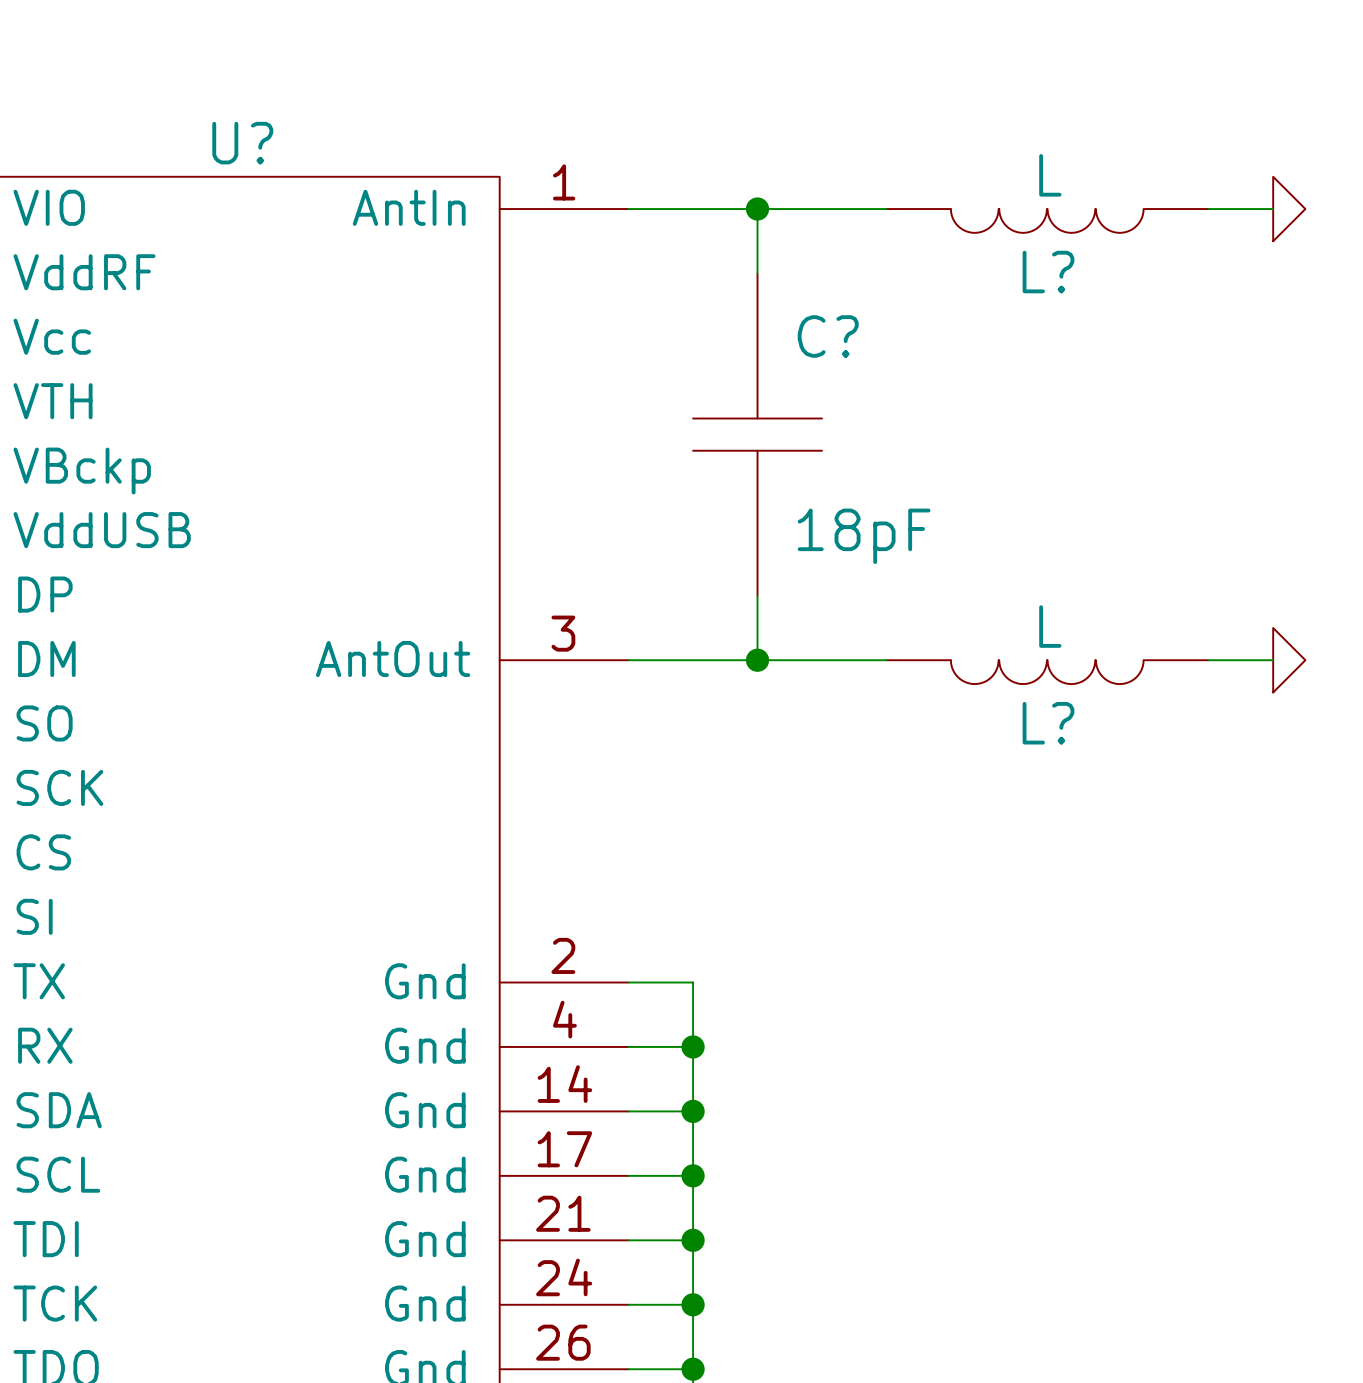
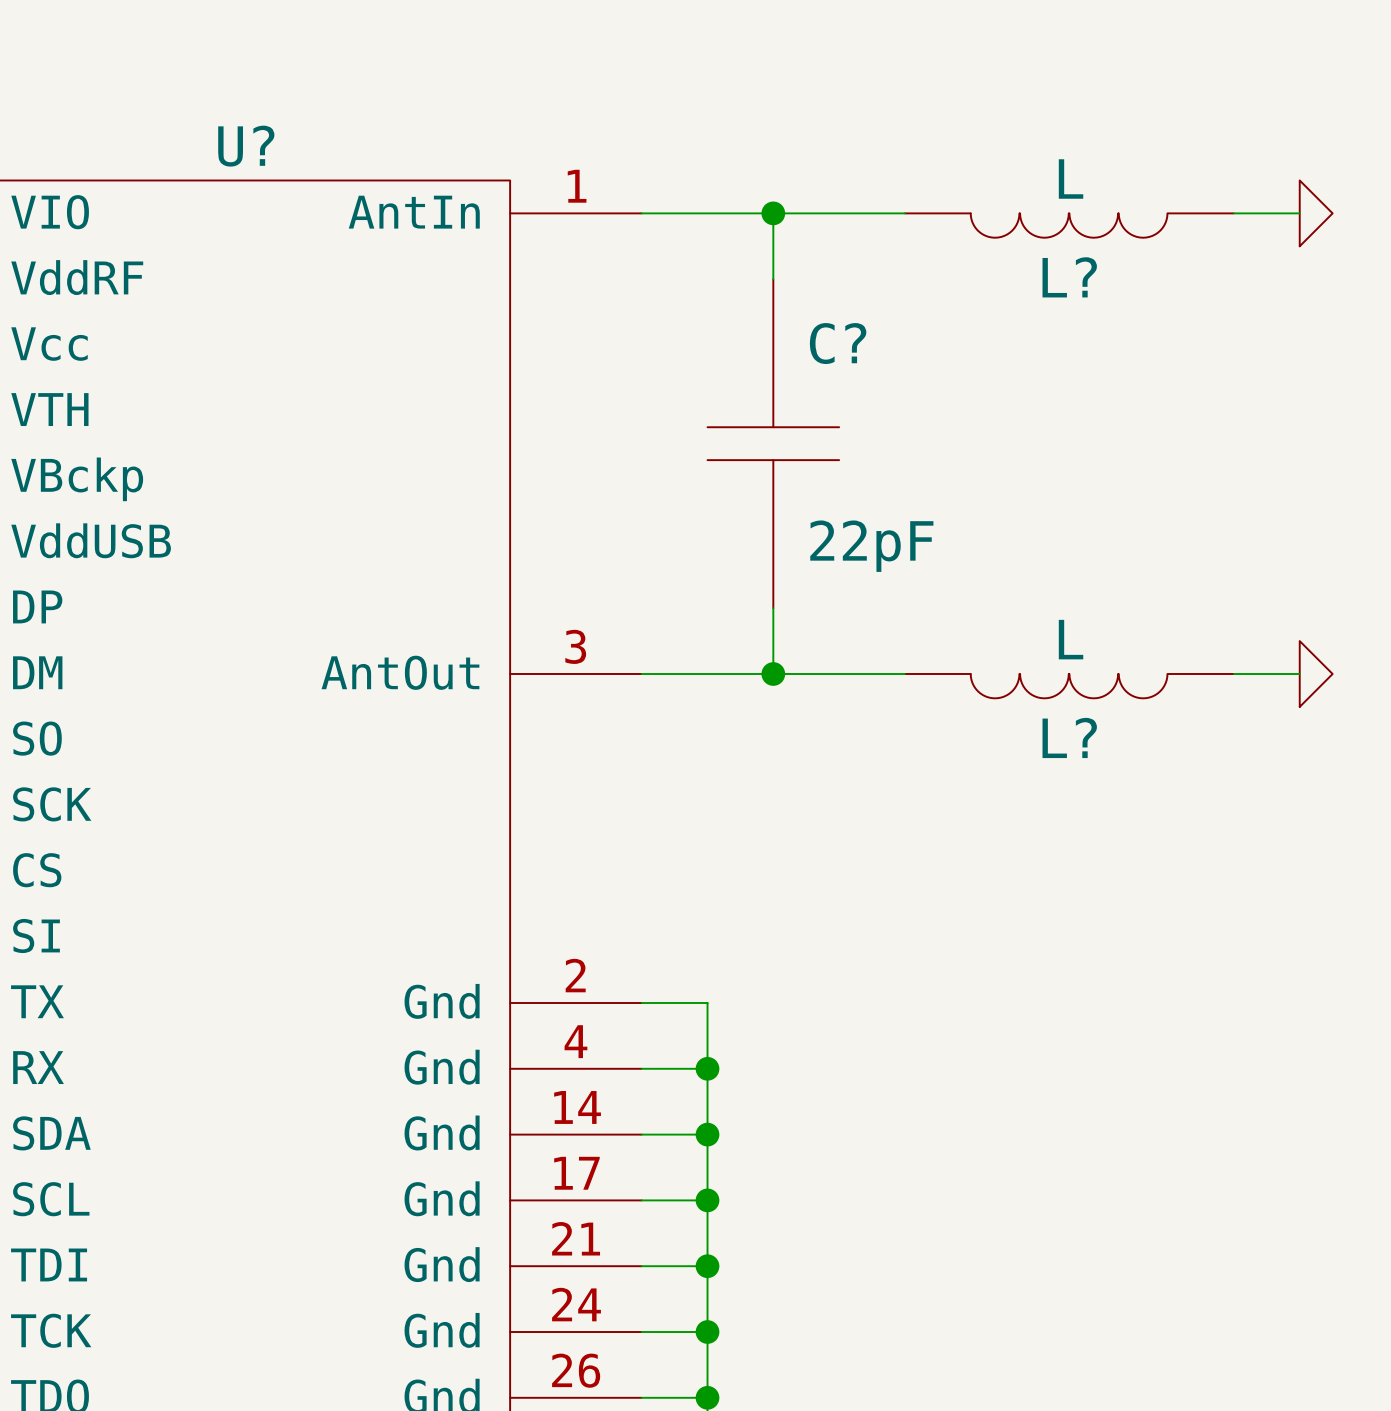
C? value: 18pF (864, 536) -> 22pF (871, 546)

